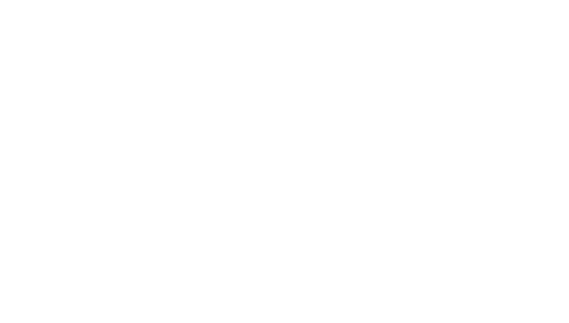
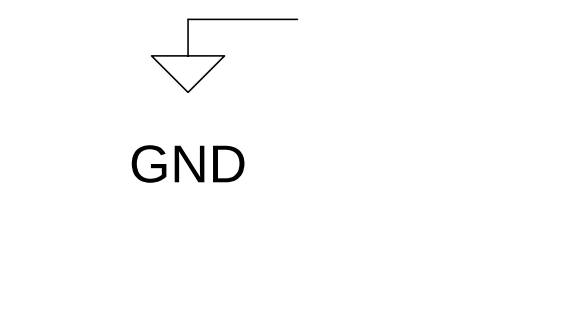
wire: none -> (188, 19) (297, 19)
power symbol: none -> GND (188, 55)

